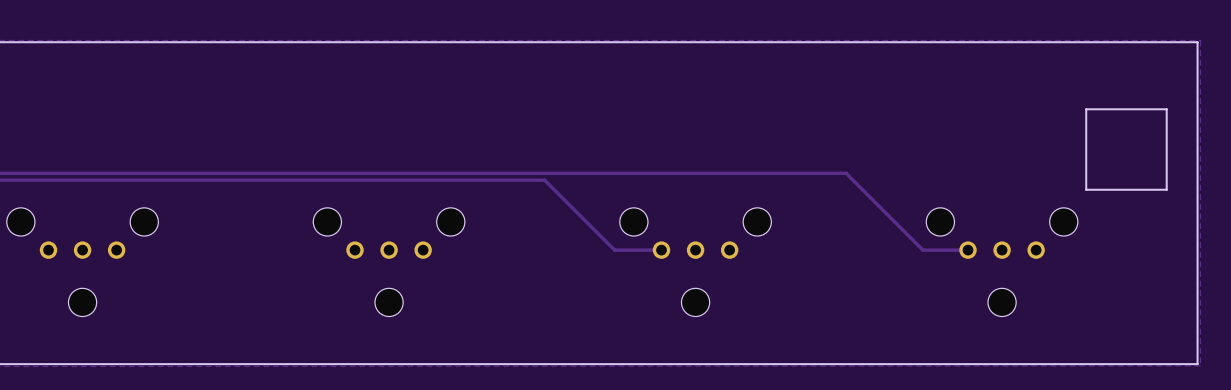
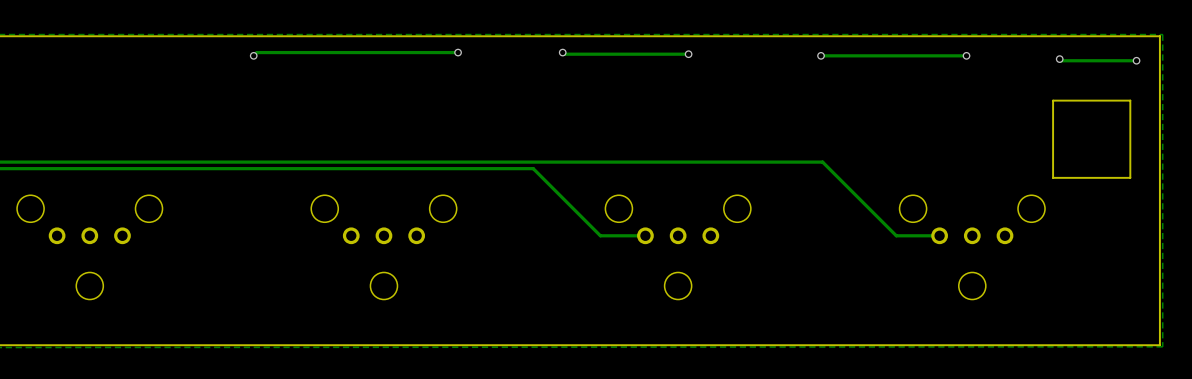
track: none -> (458, 52) (256, 52) (253, 55)
via: none -> (458, 52)
track: none -> (562, 52) (564, 54) (688, 54)
via: none -> (562, 52)
via: none -> (688, 54)
via: none -> (253, 55)
via: none -> (821, 55)
track: none -> (966, 55) (821, 55)
via: none -> (966, 55)
track: none -> (1059, 59) (1061, 60) (1136, 60)
via: none -> (1059, 59)
via: none -> (1136, 60)

